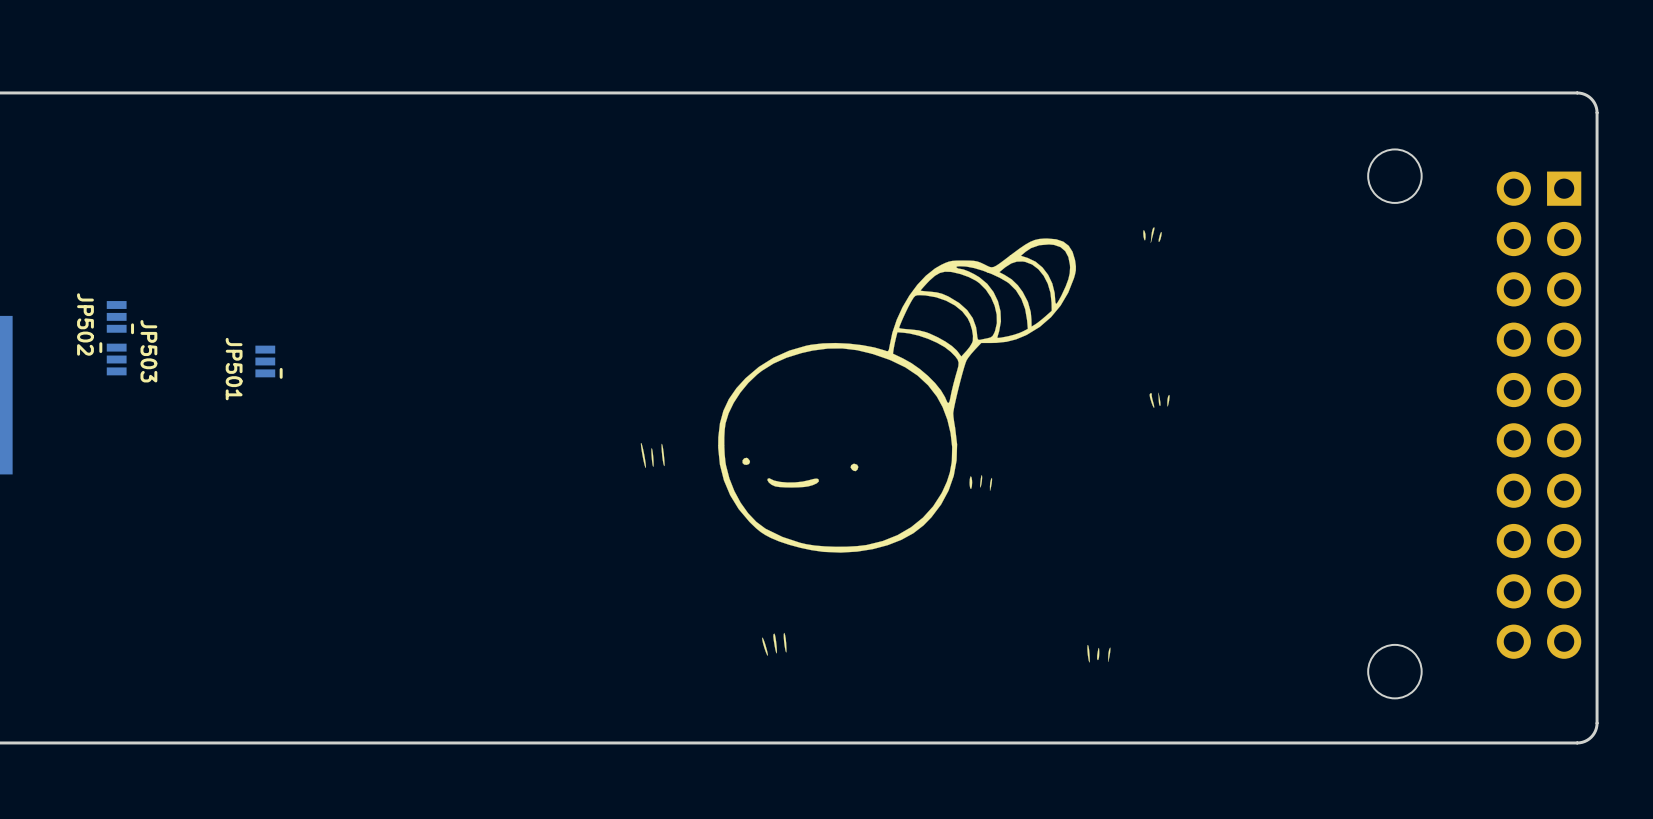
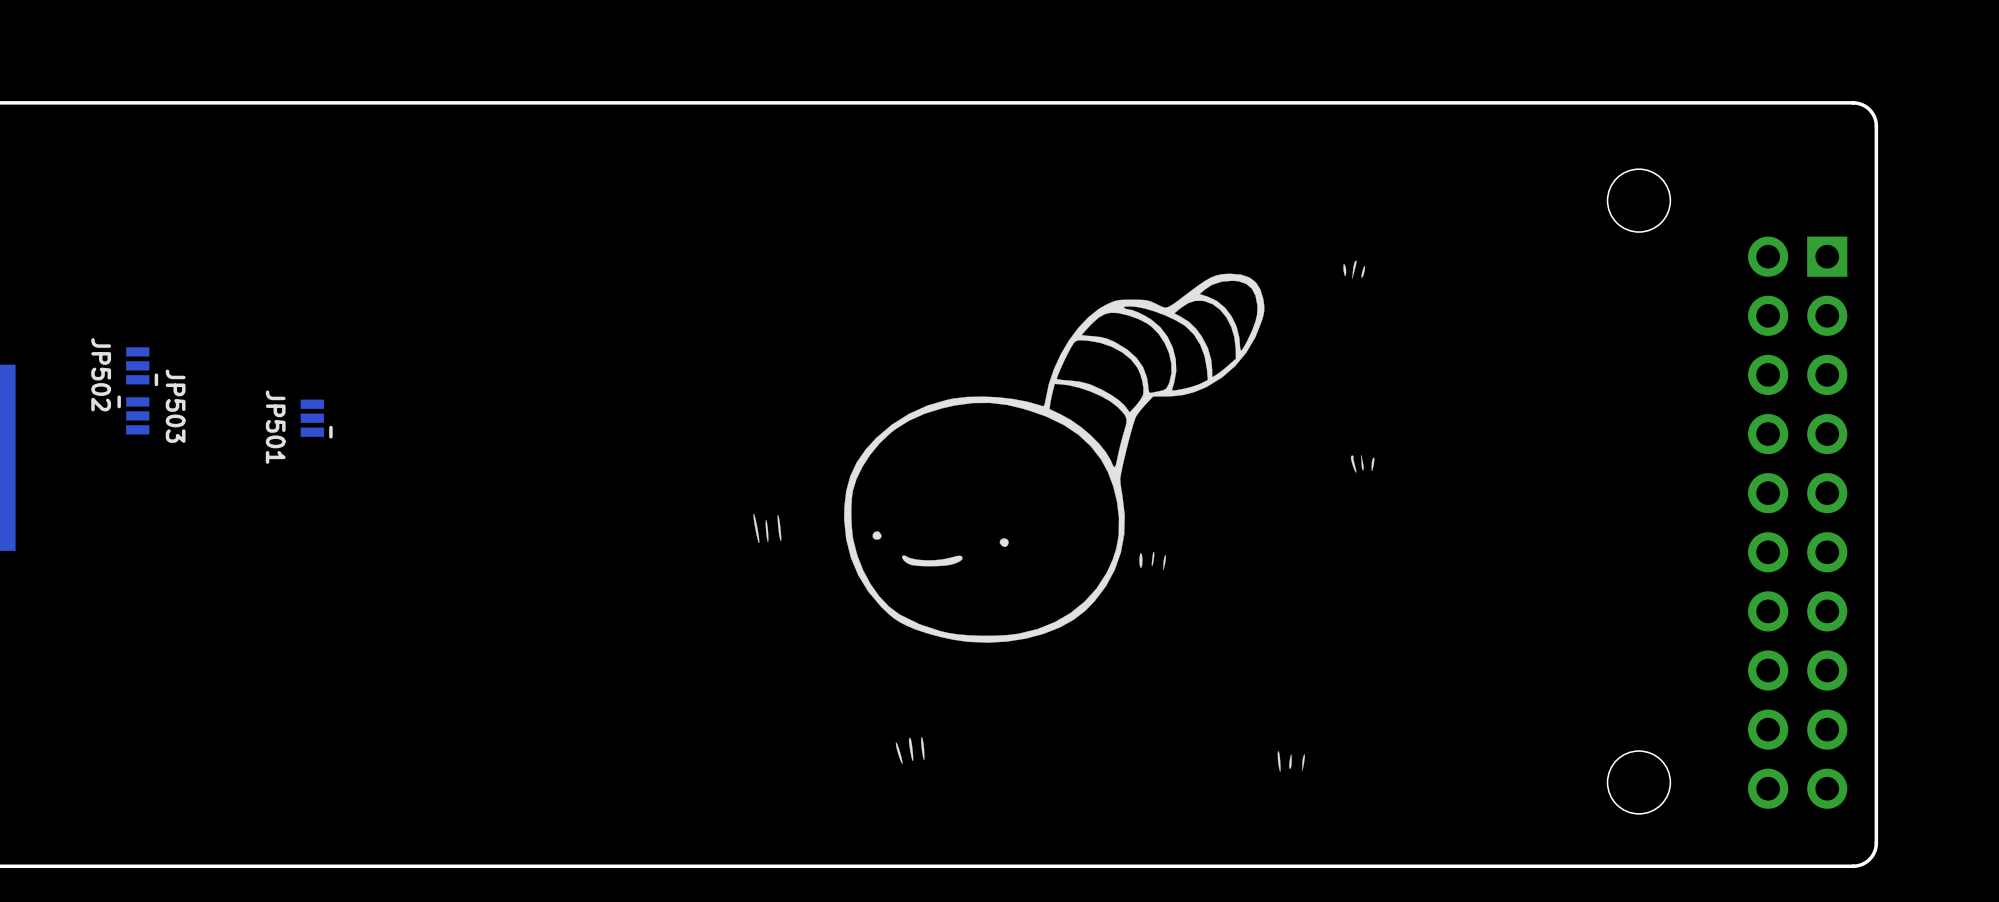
part position: (1538, 415) -> (1797, 522)

